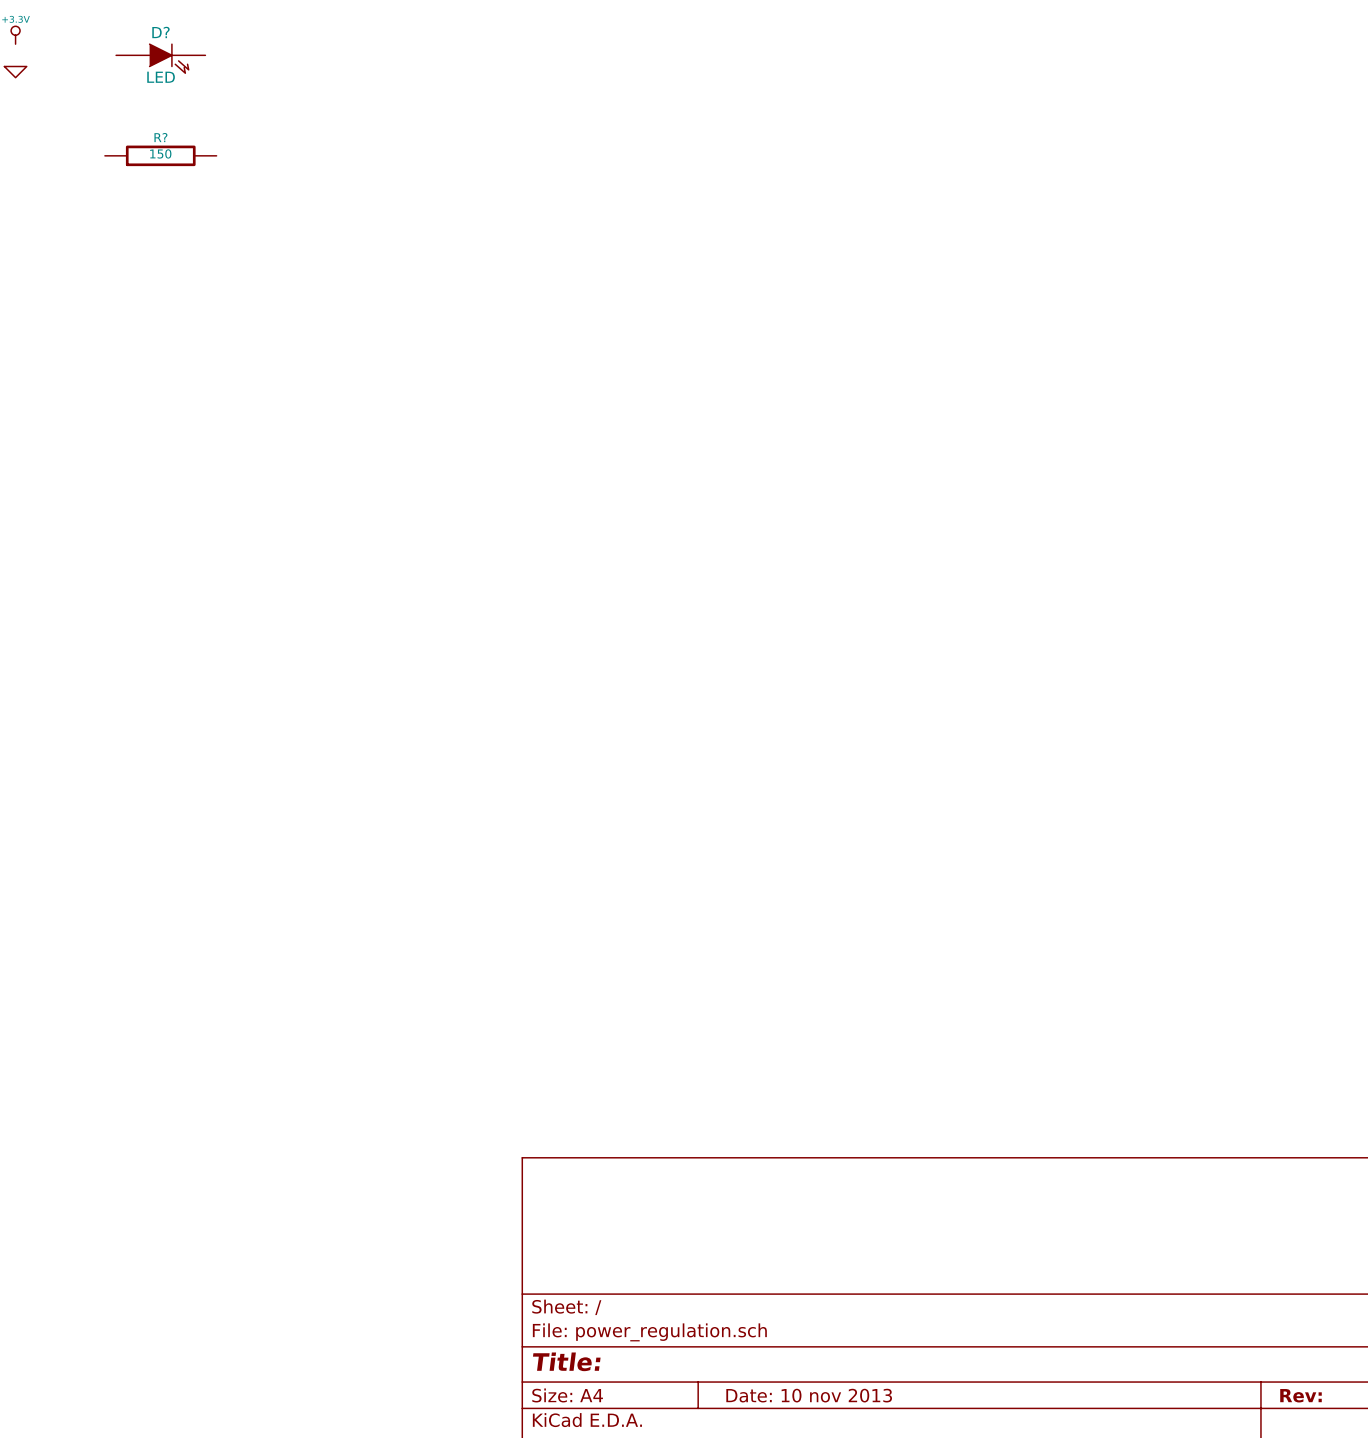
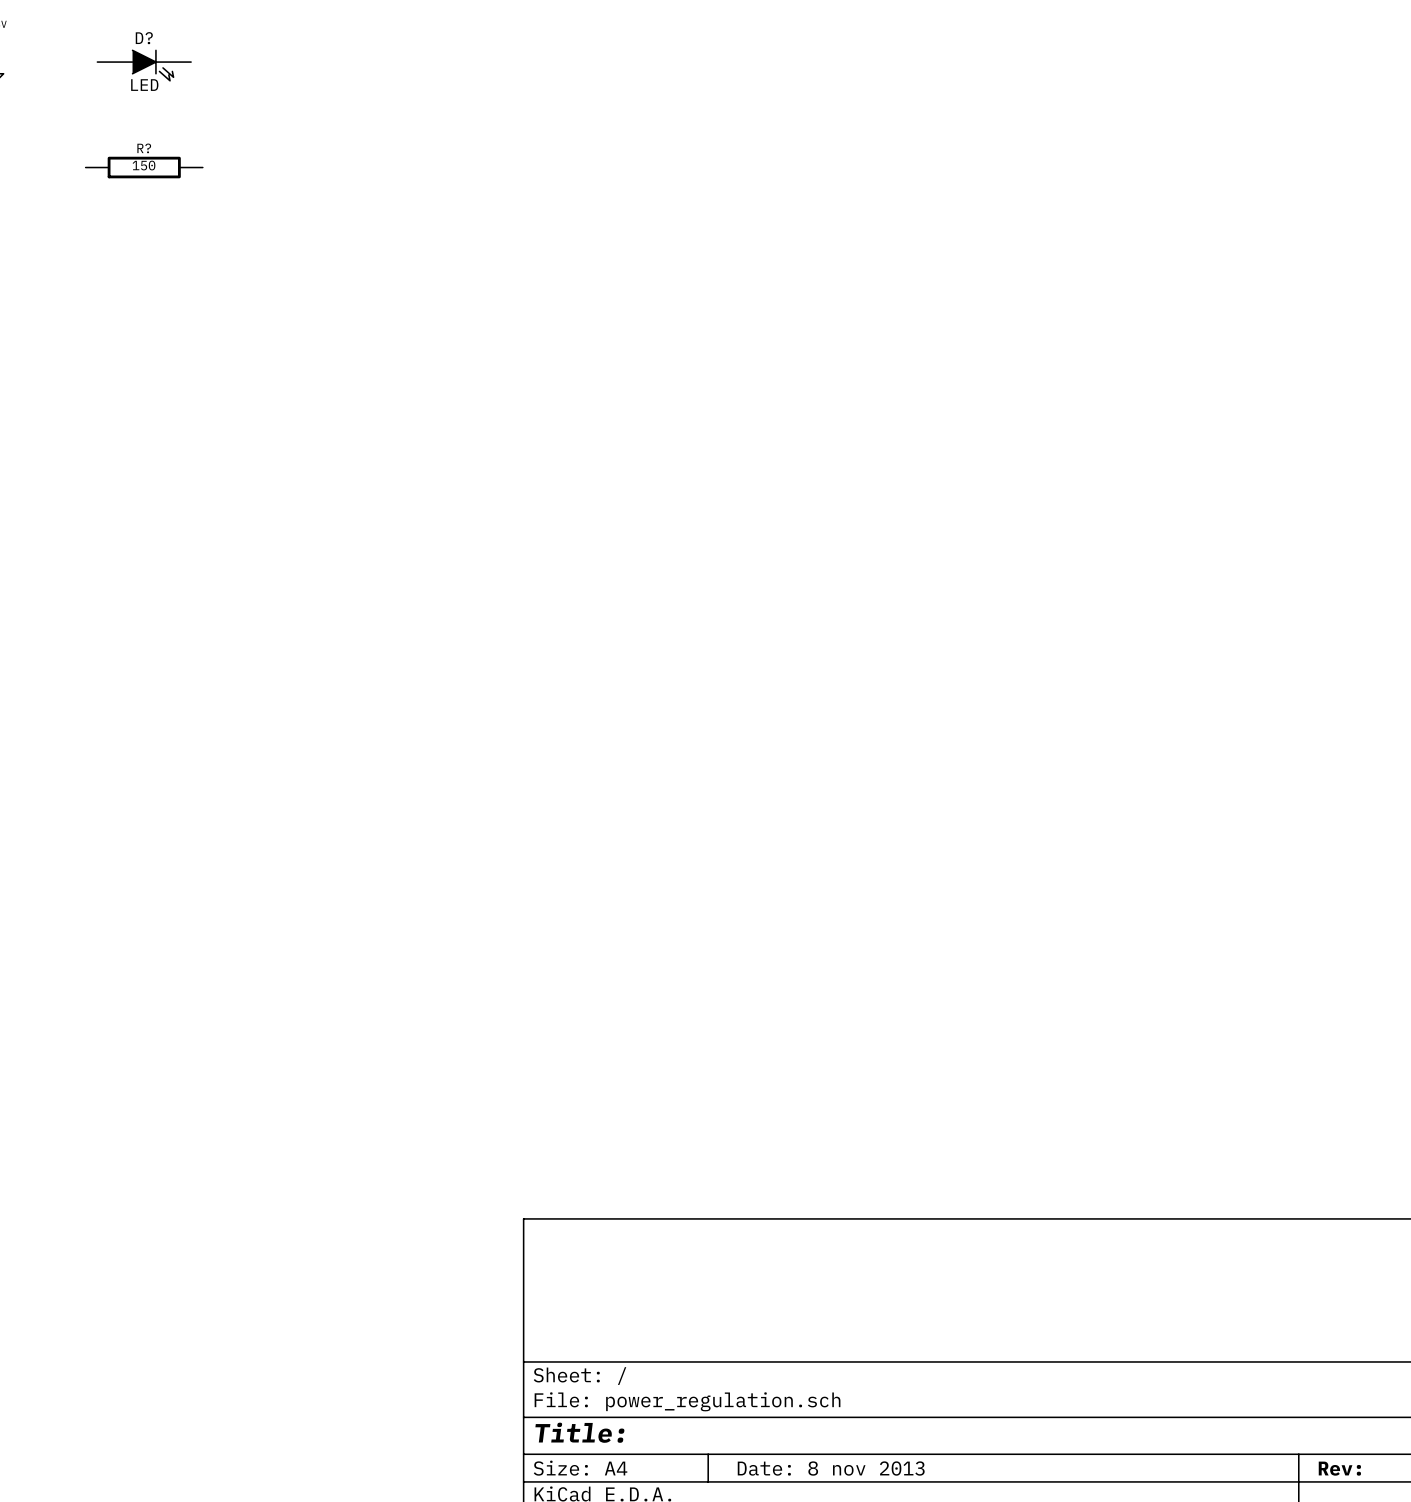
title block: Date: 10 nov 2013 (809, 1395) -> Date: 8 nov 2013 (831, 1468)

